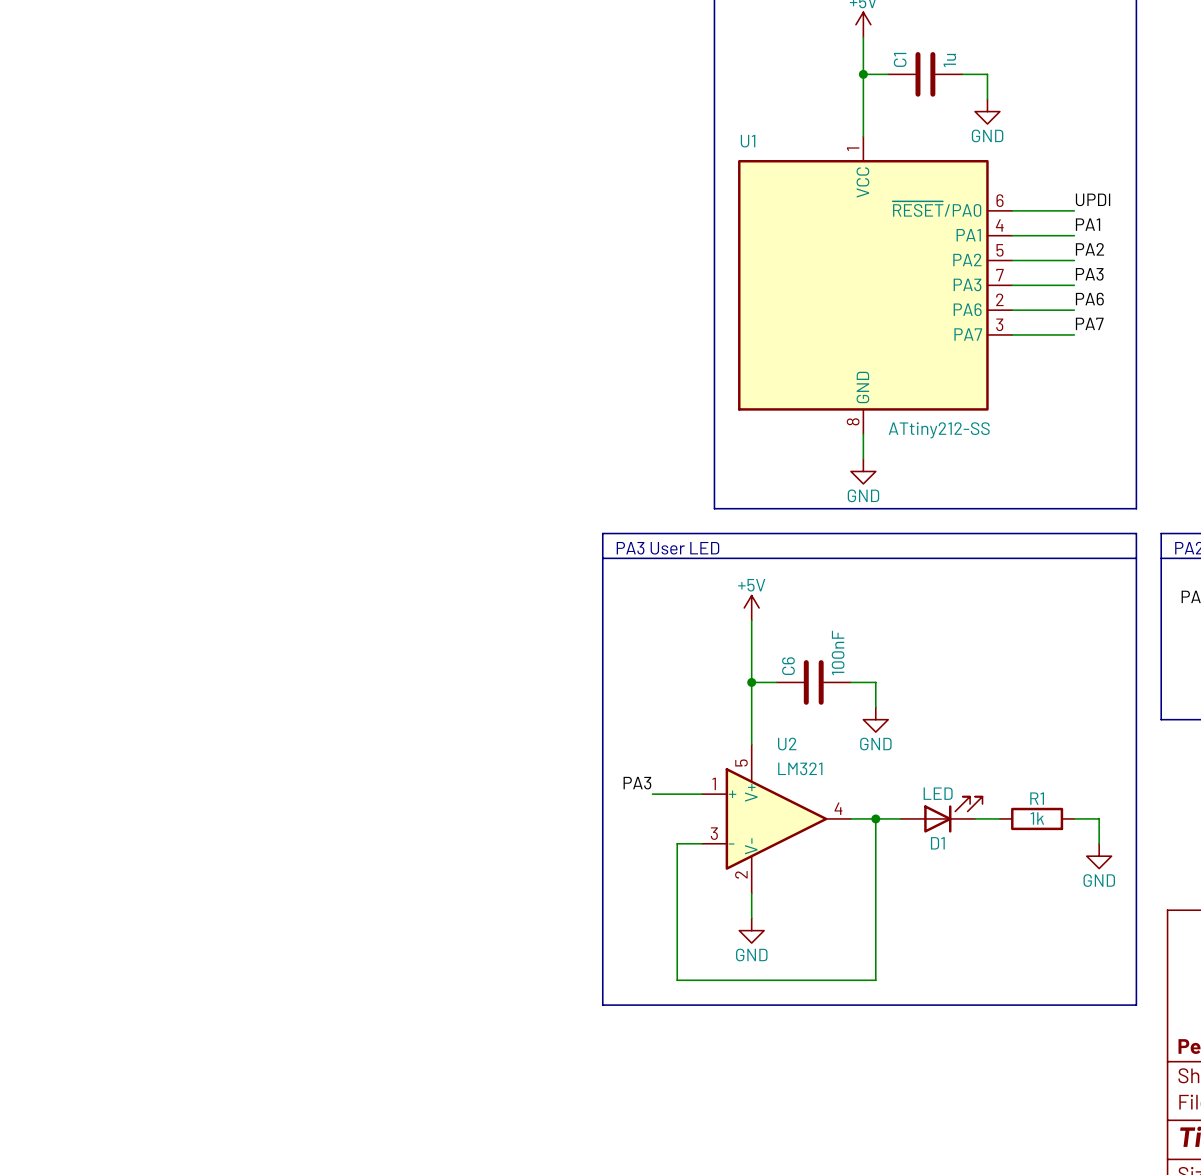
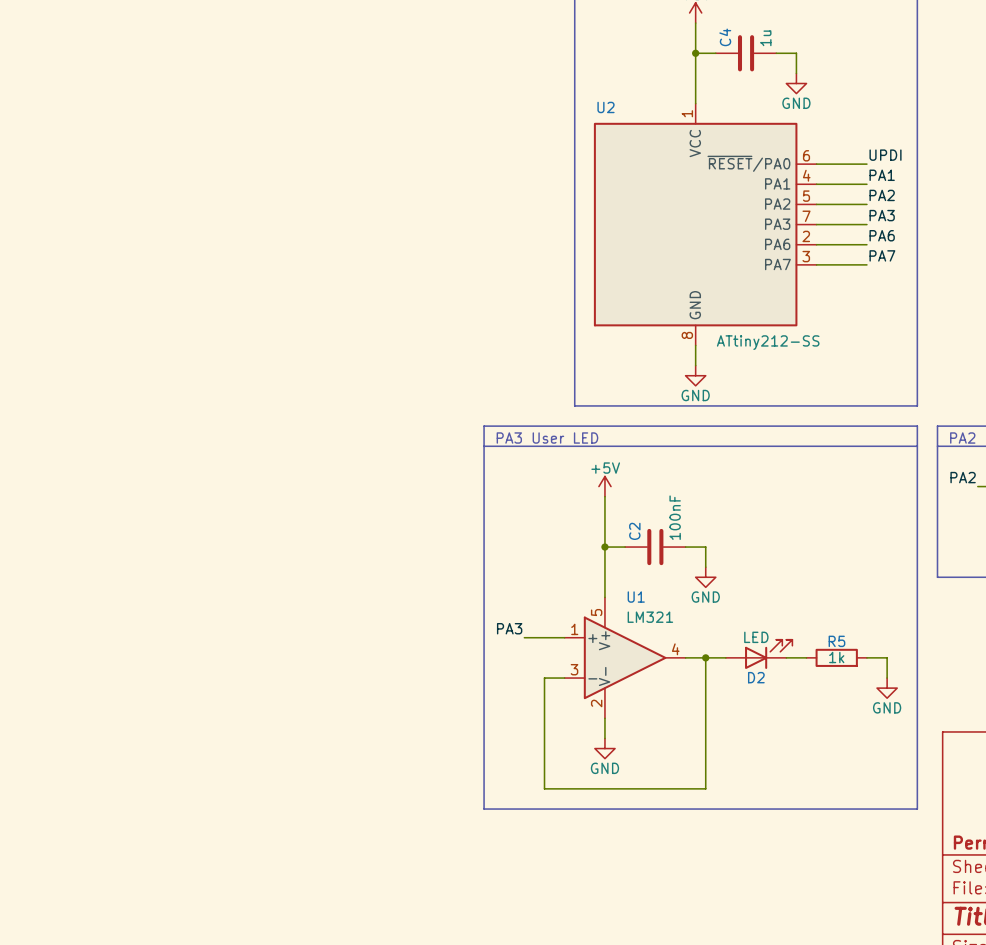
C1 name: C1 (900, 59) -> C4 (725, 37)
U1 name: U1 (748, 141) -> U2 (606, 107)
C6 name: C6 (788, 666) -> C2 (634, 531)
U2 name: U2 (787, 744) -> U1 (636, 597)
R1 name: R1 (1037, 798) -> R5 (836, 641)
D1 name: D1 (937, 843) -> D2 (756, 677)

